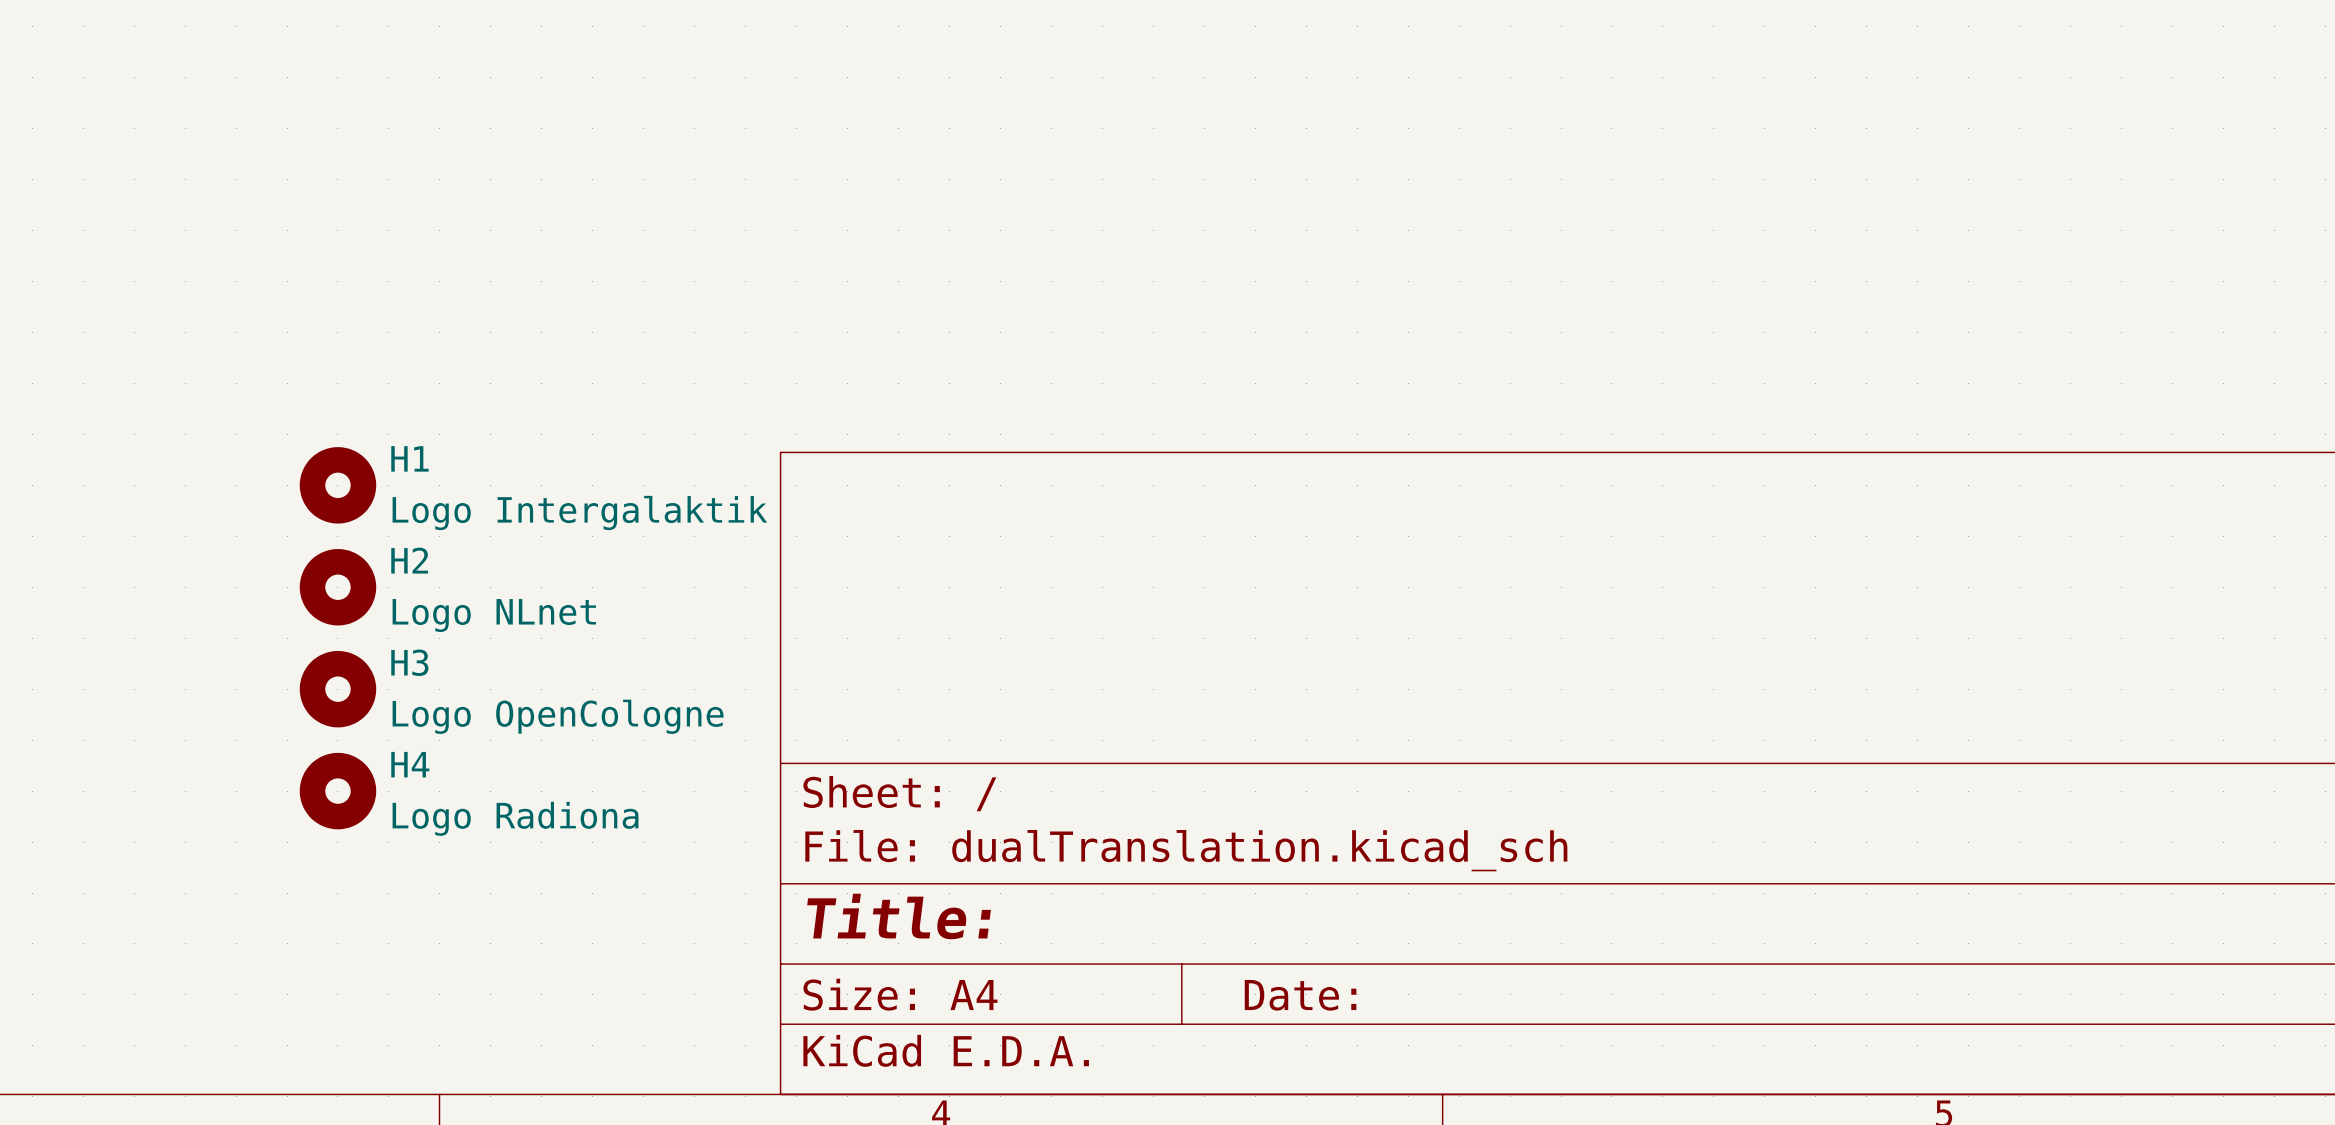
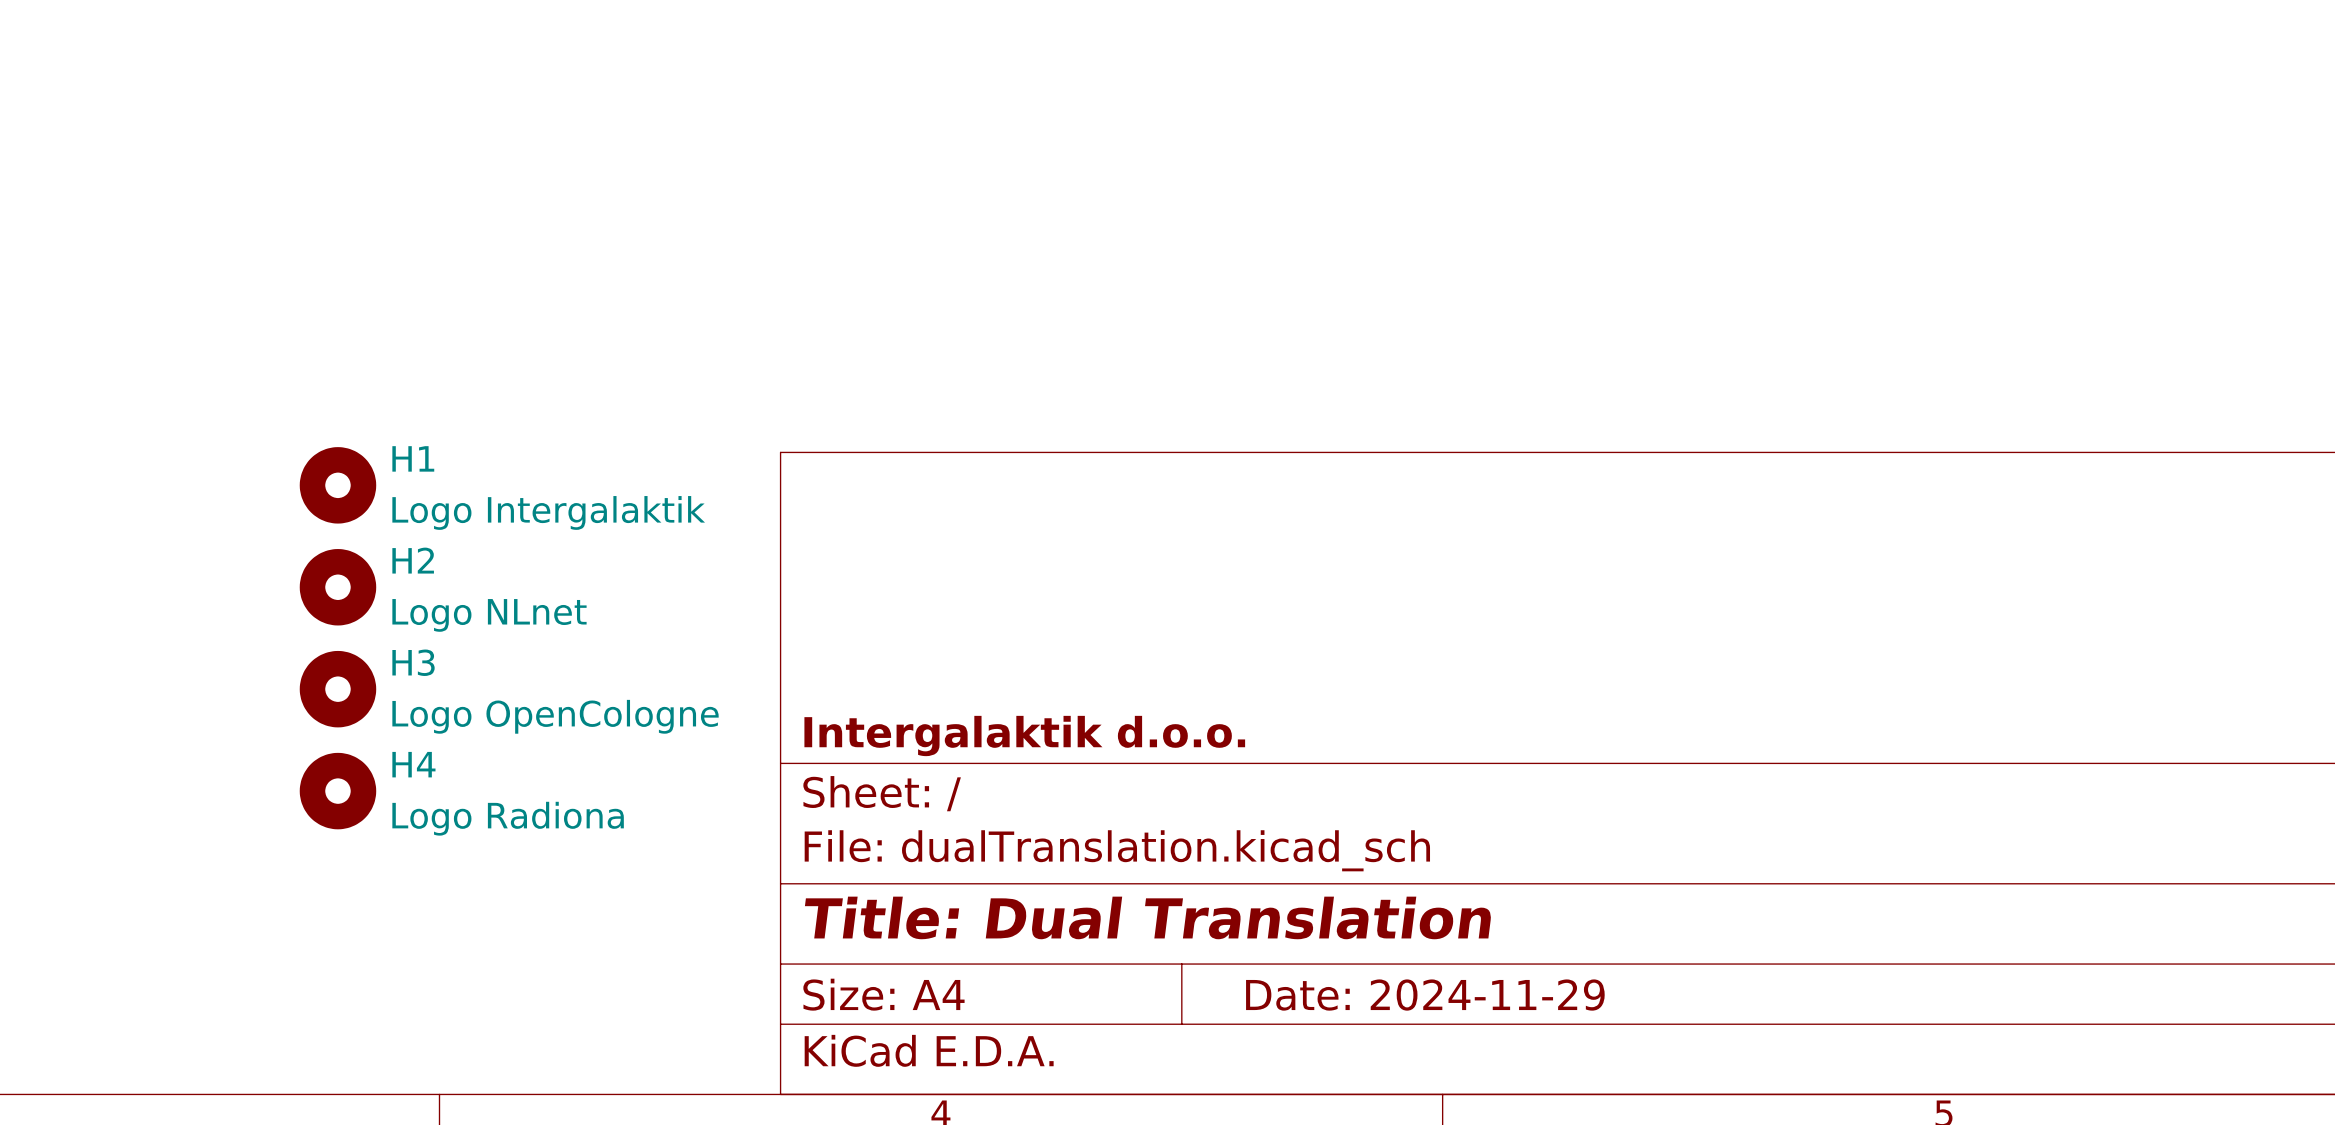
title block: none -> Intergalaktik d.o.o. (1024, 736)
title block: Title: (899, 916) -> Title: Dual Translation (1148, 917)
title block: Date: (1300, 995) -> Date: 2024-11-29 (1425, 995)

